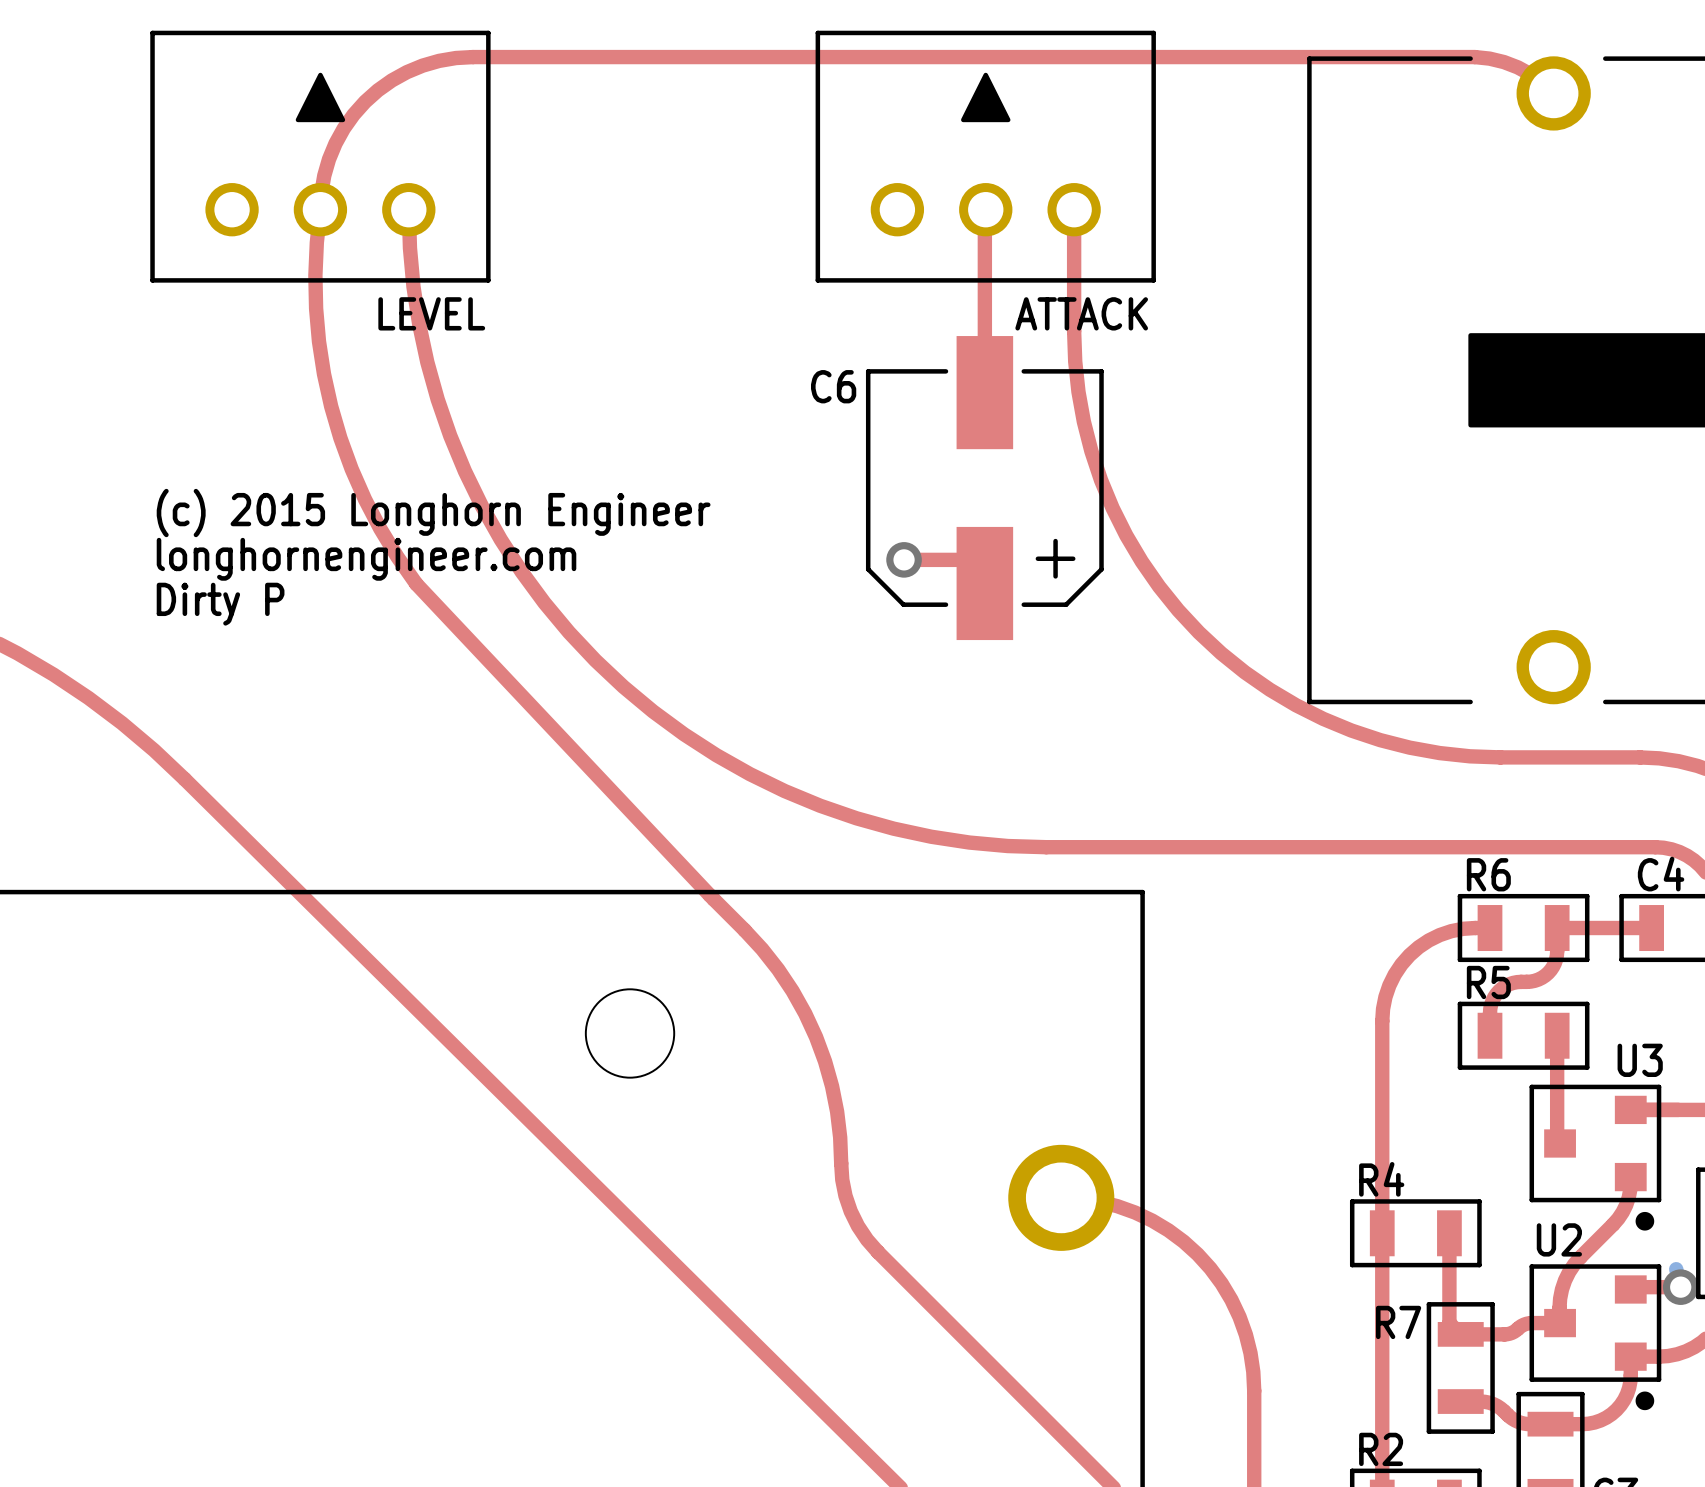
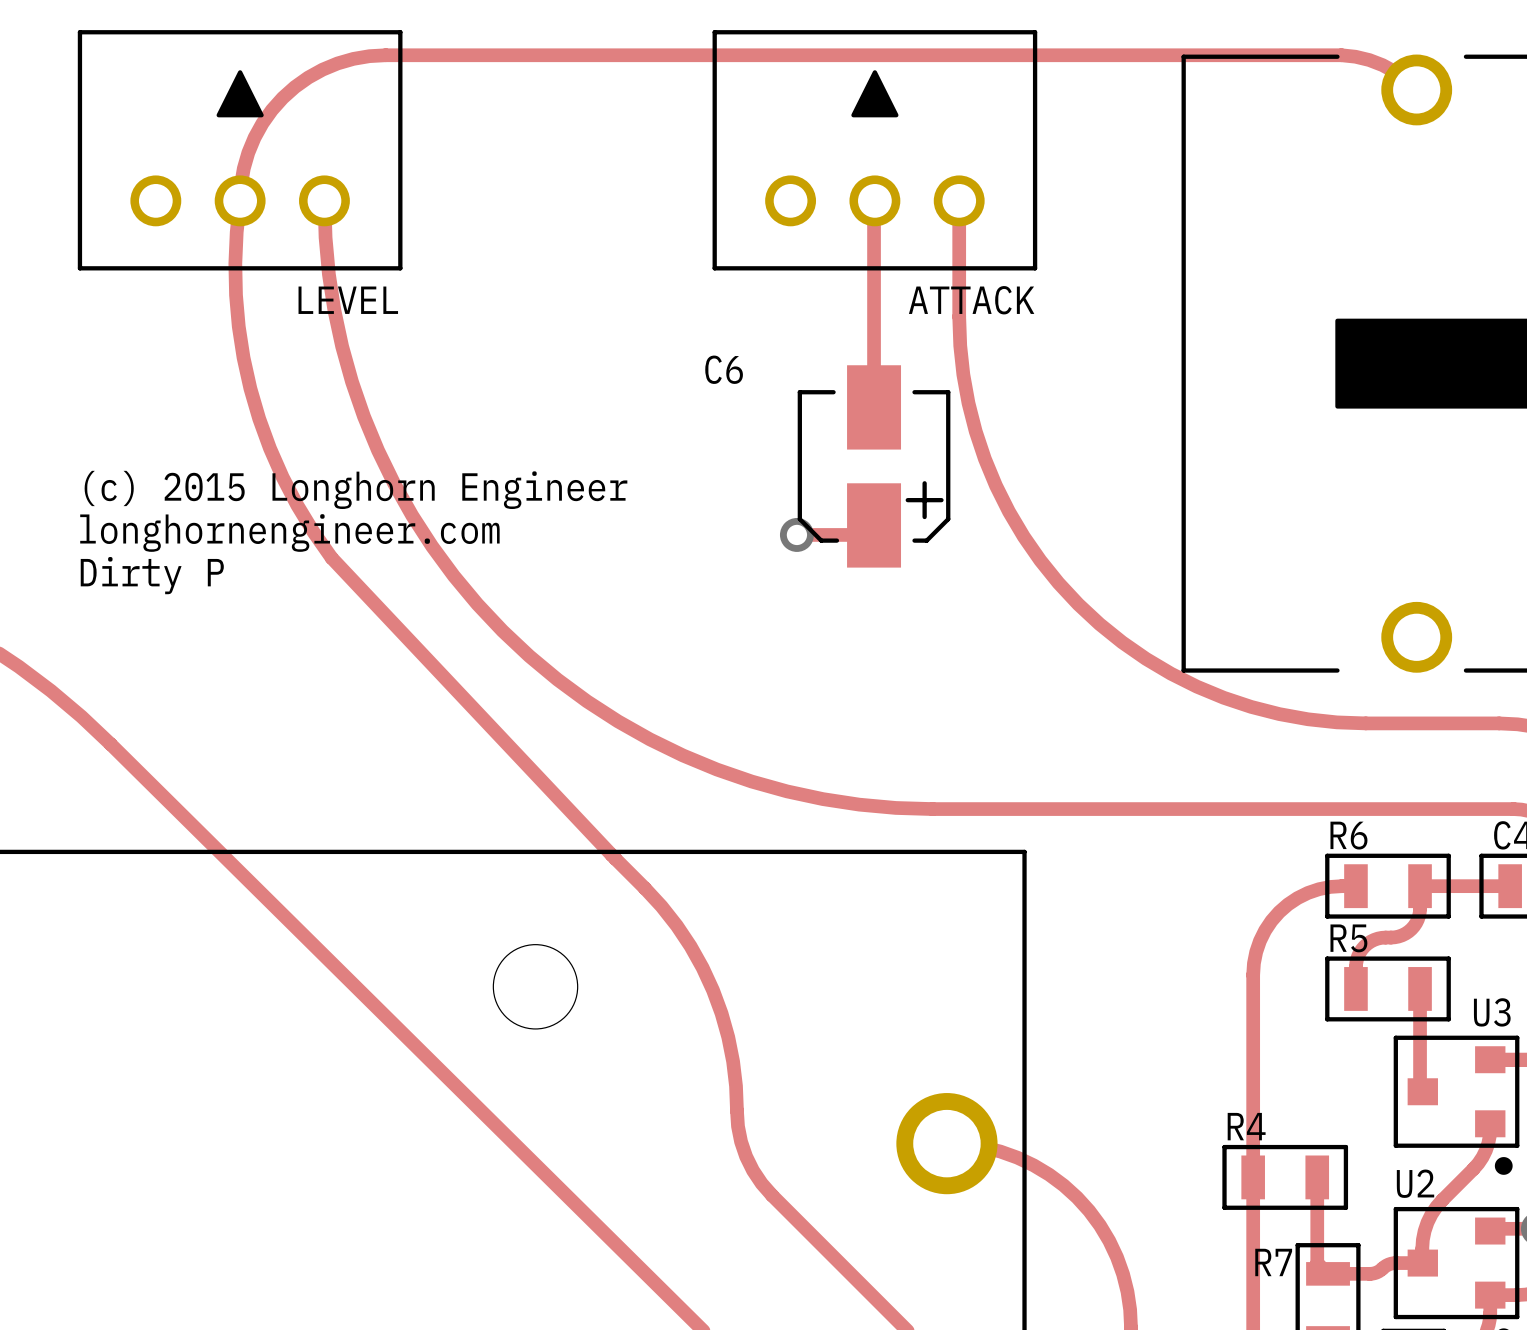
C6 footprint: [865, 336, 1104, 641] -> [797, 365, 951, 568]

